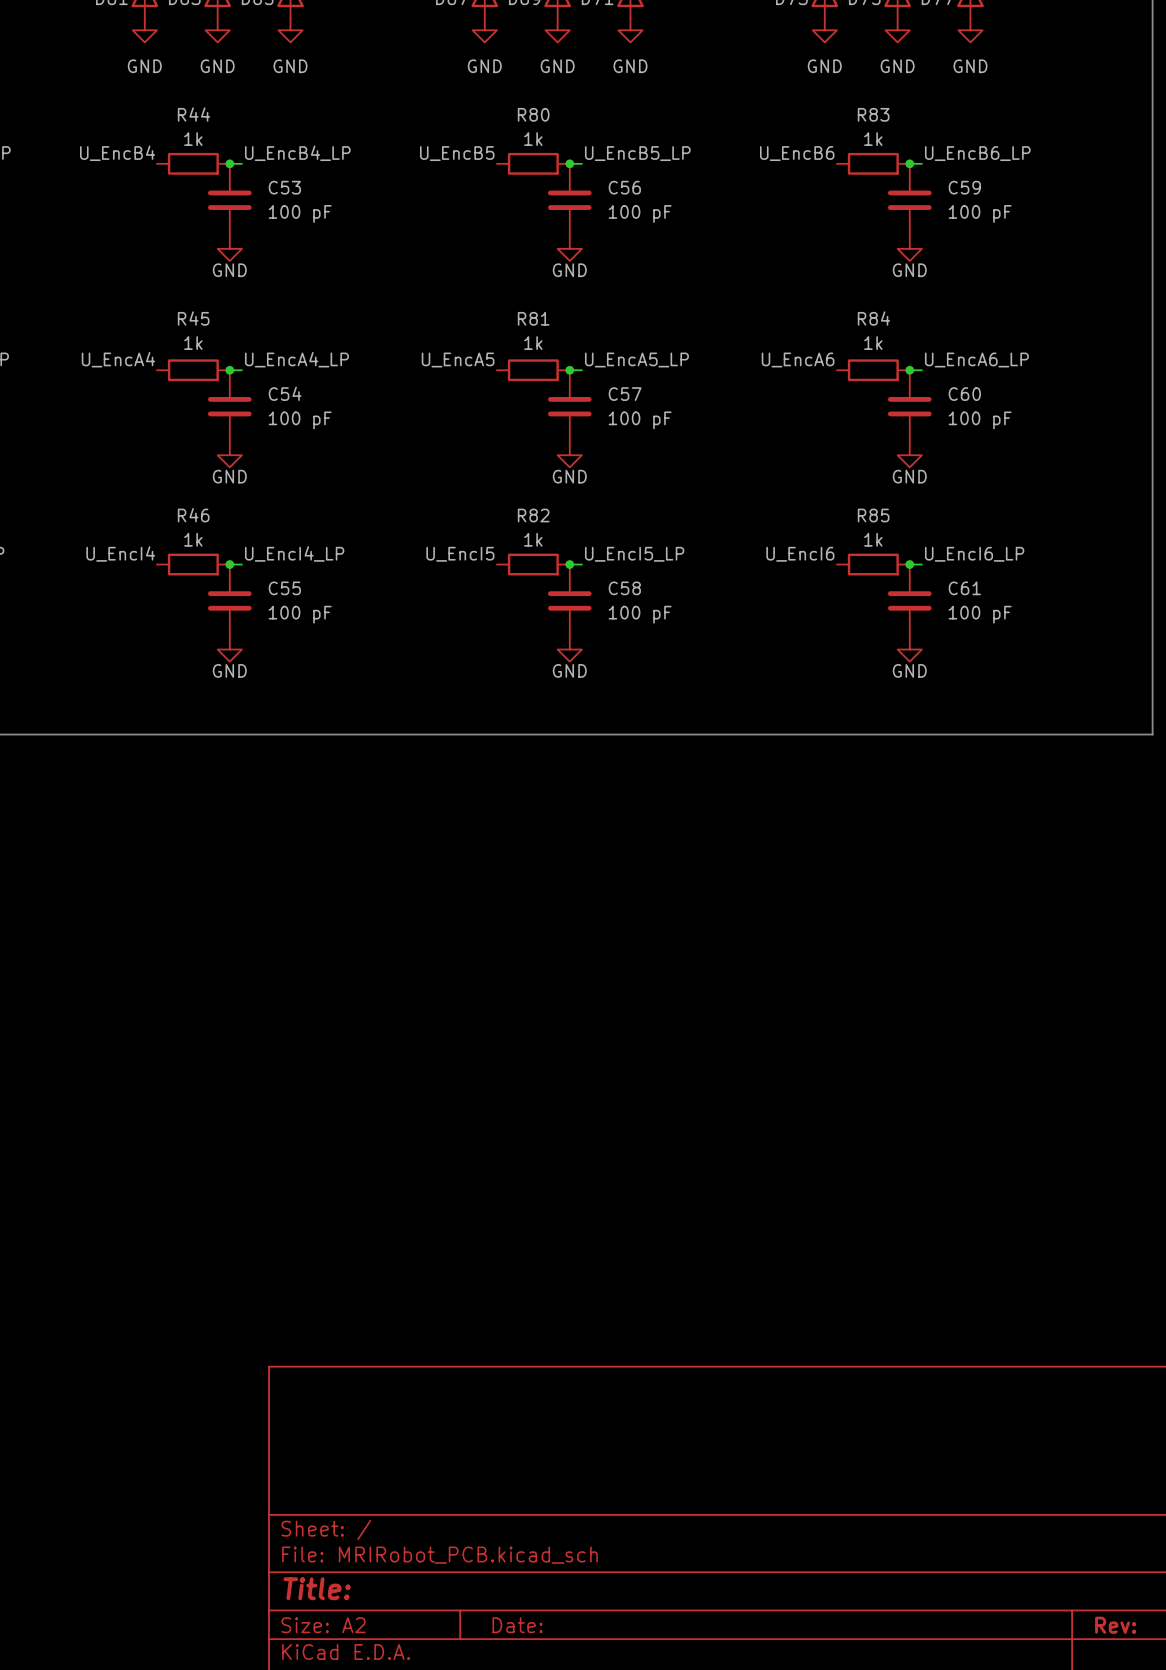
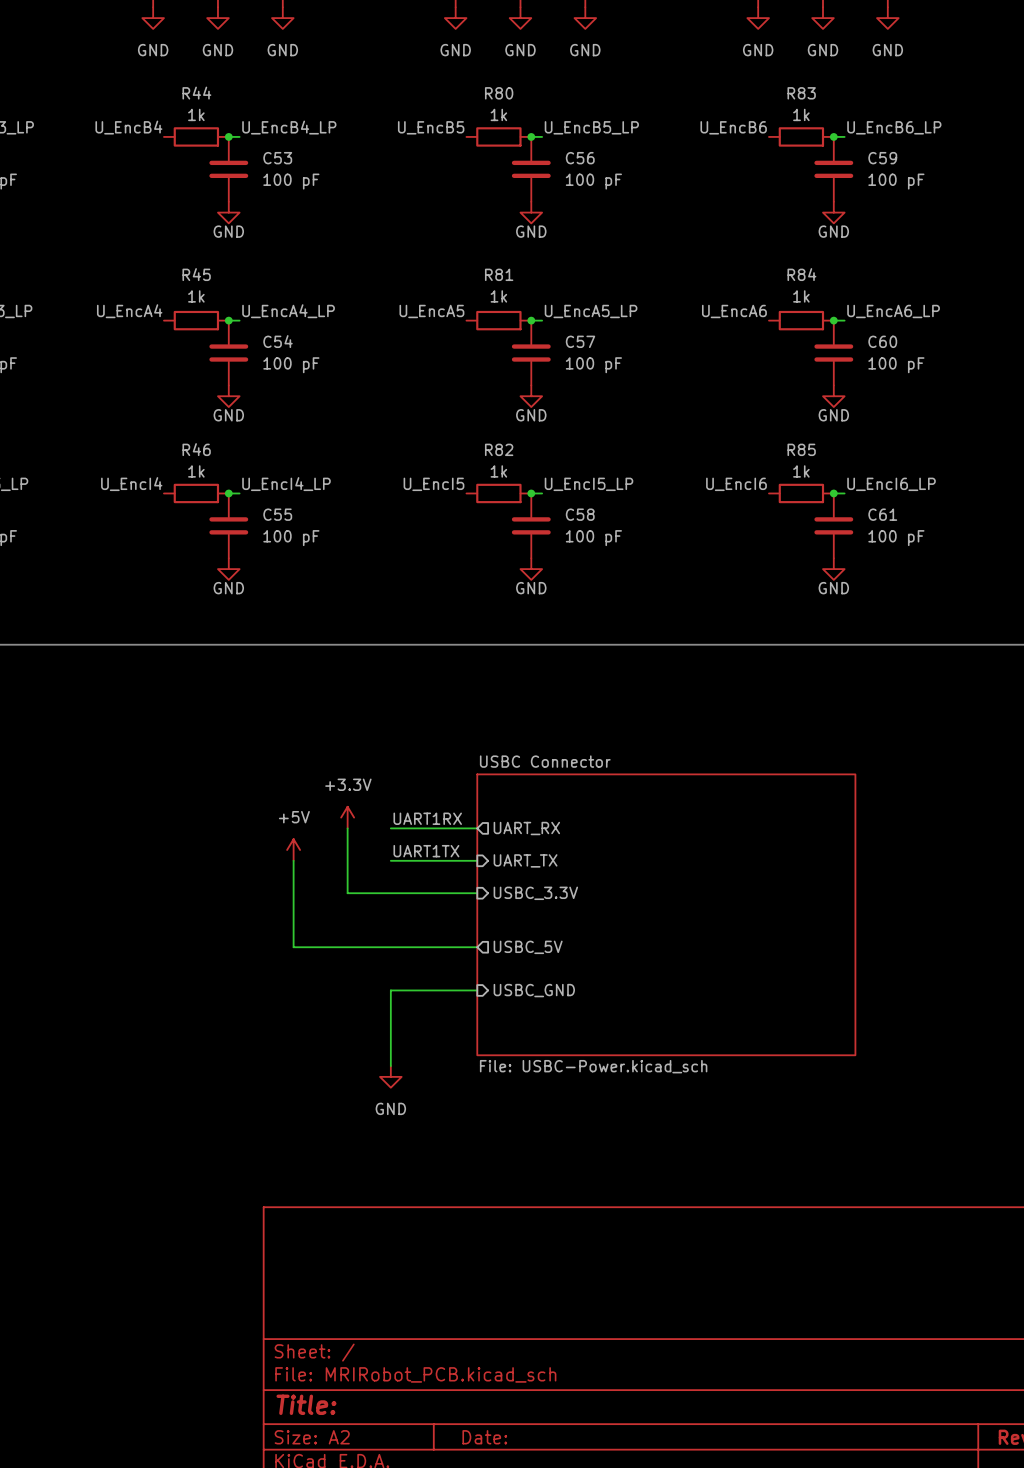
power symbol: none -> +3.3V (347, 817)
label: none -> UART1RX (427, 818)
wire: none -> (347, 828) (347, 893) (477, 893)
wire: none -> (390, 828) (477, 828)
sheet pin: none -> UART_RX (526, 828)
power symbol: none -> +5V (293, 850)
label: none -> UART1TX (426, 851)
wire: none -> (293, 860) (293, 947) (477, 947)
wire: none -> (390, 860) (477, 860)
sheet pin: none -> UART_TX (525, 860)
sheet pin: none -> USBC_3.3V (535, 893)
sheet USBC Connector: none -> File: USBC-Power.kicad_sch (666, 914)
sheet pin: none -> USBC_5V (528, 947)
wire: none -> (477, 990) (390, 990) (390, 1066)
sheet pin: none -> USBC_GND (534, 990)
power symbol: none -> GND (390, 1076)

